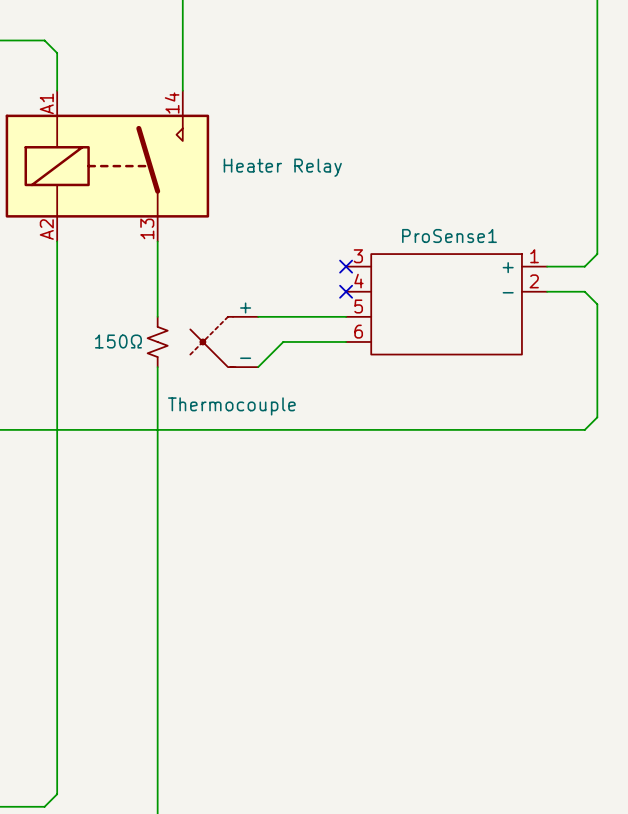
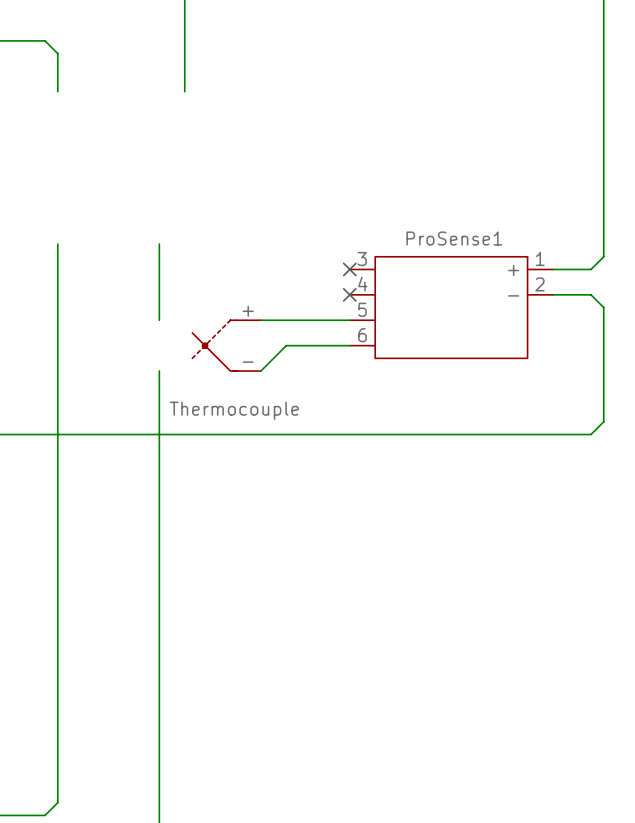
part: Heater Relay (107, 166) -> none
part: 150Ω (157, 341) -> none

